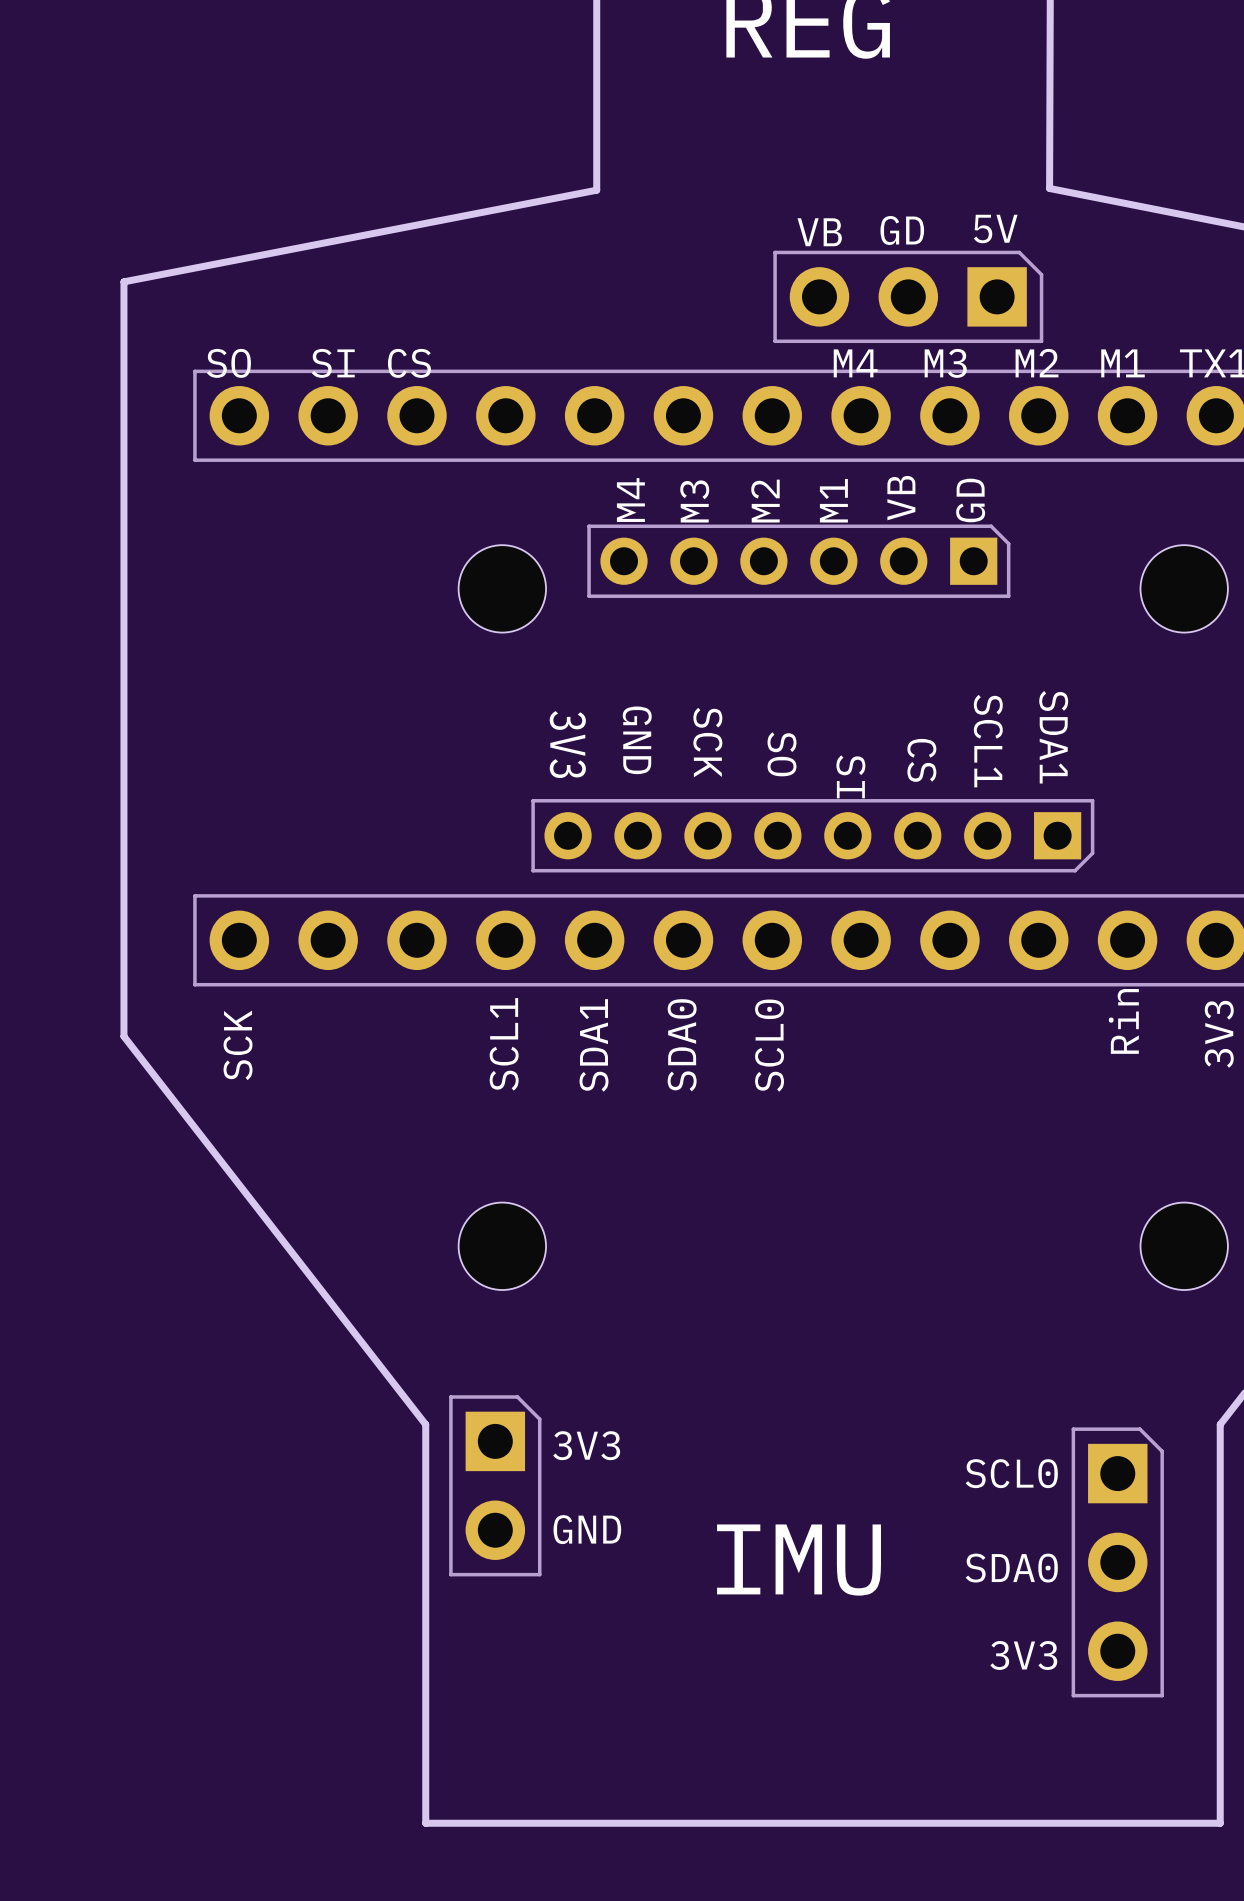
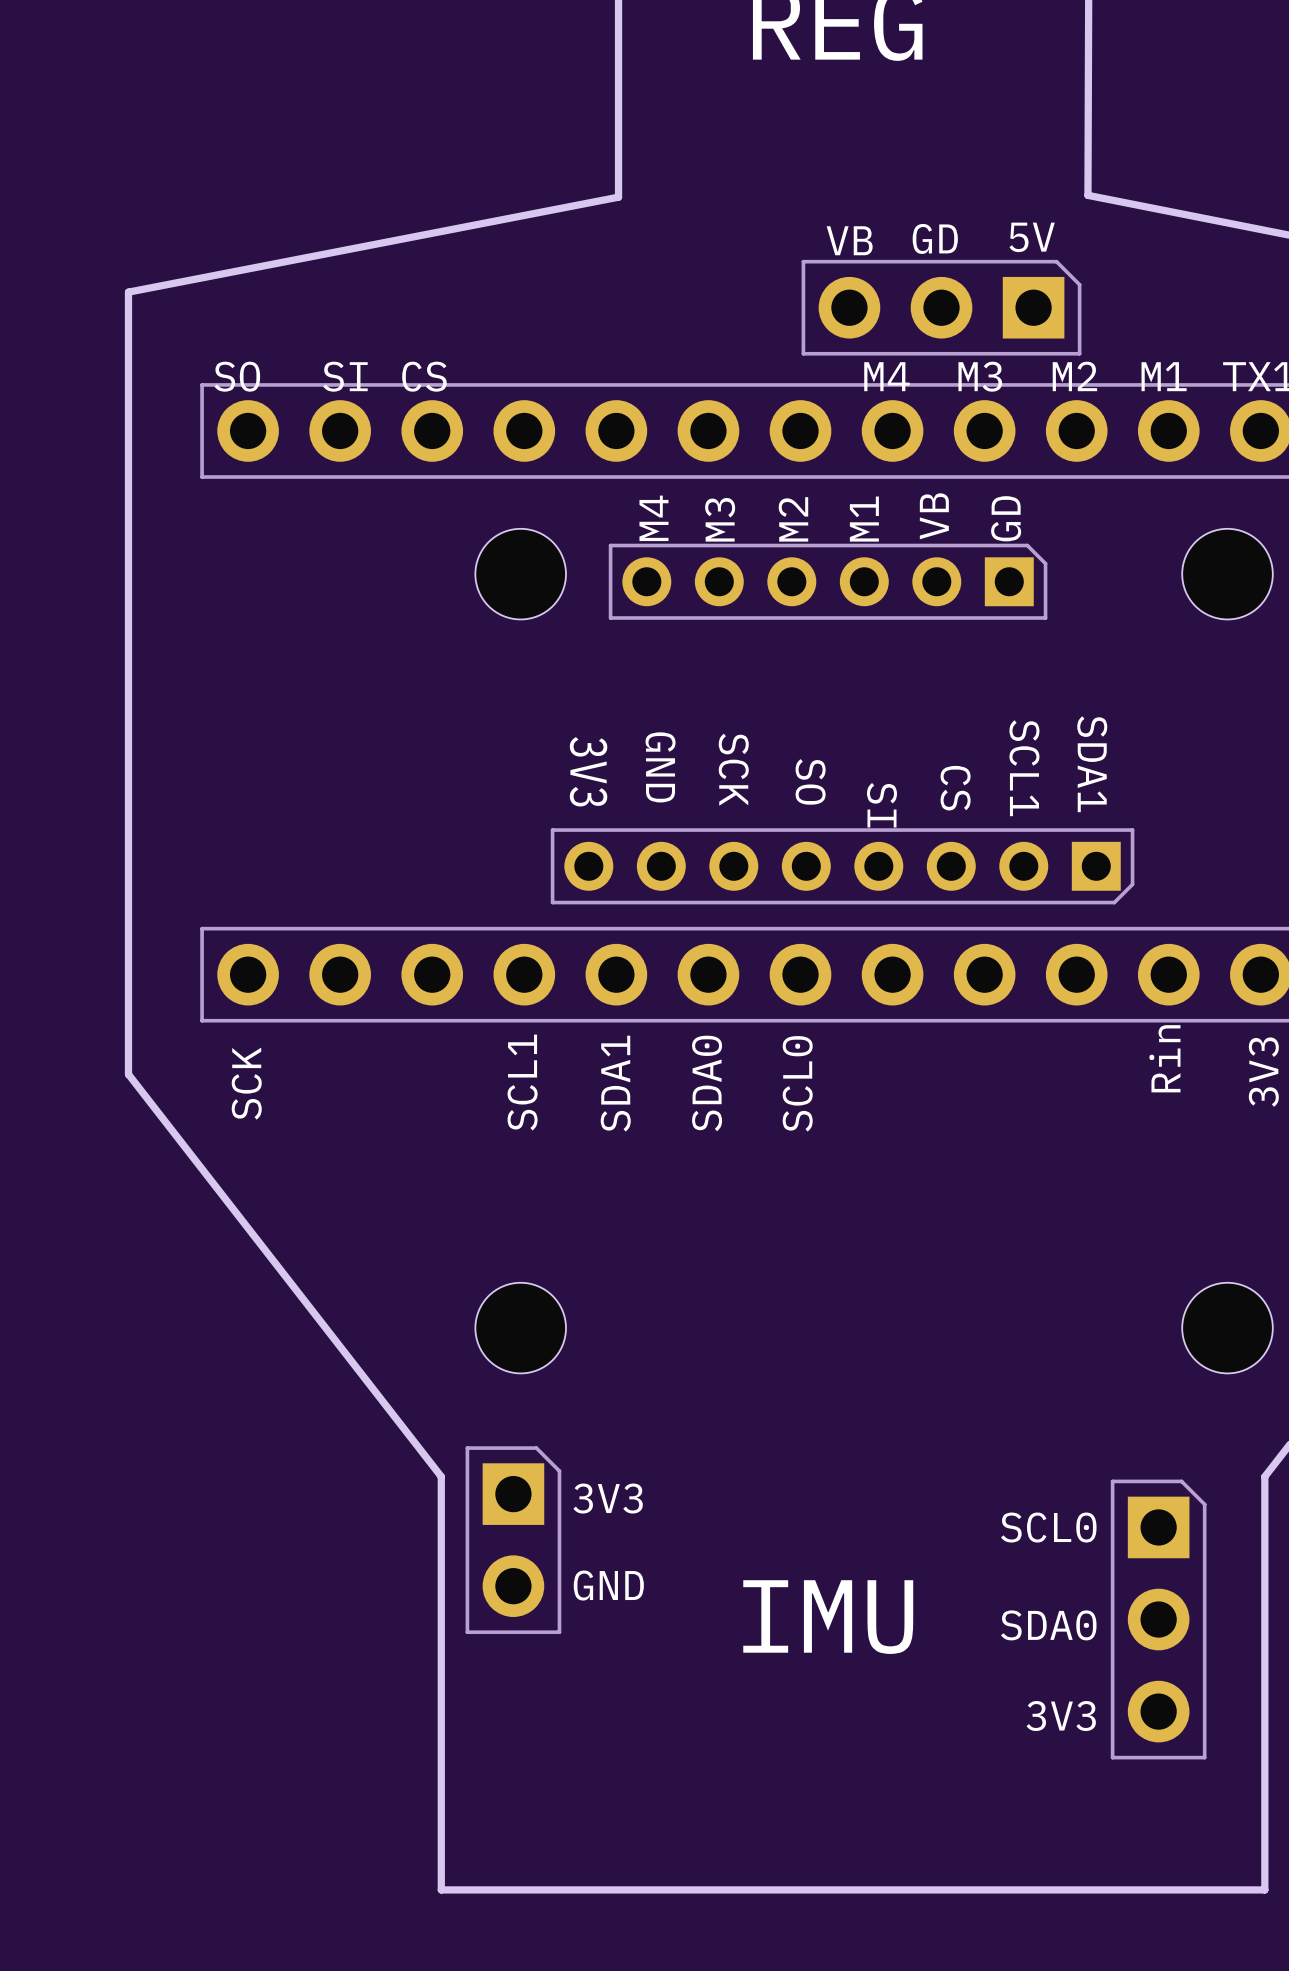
part position: (502, 588) -> (520, 574)
part position: (1184, 588) -> (1227, 574)
part position: (502, 1246) -> (520, 1328)
part position: (1184, 1246) -> (1227, 1328)

